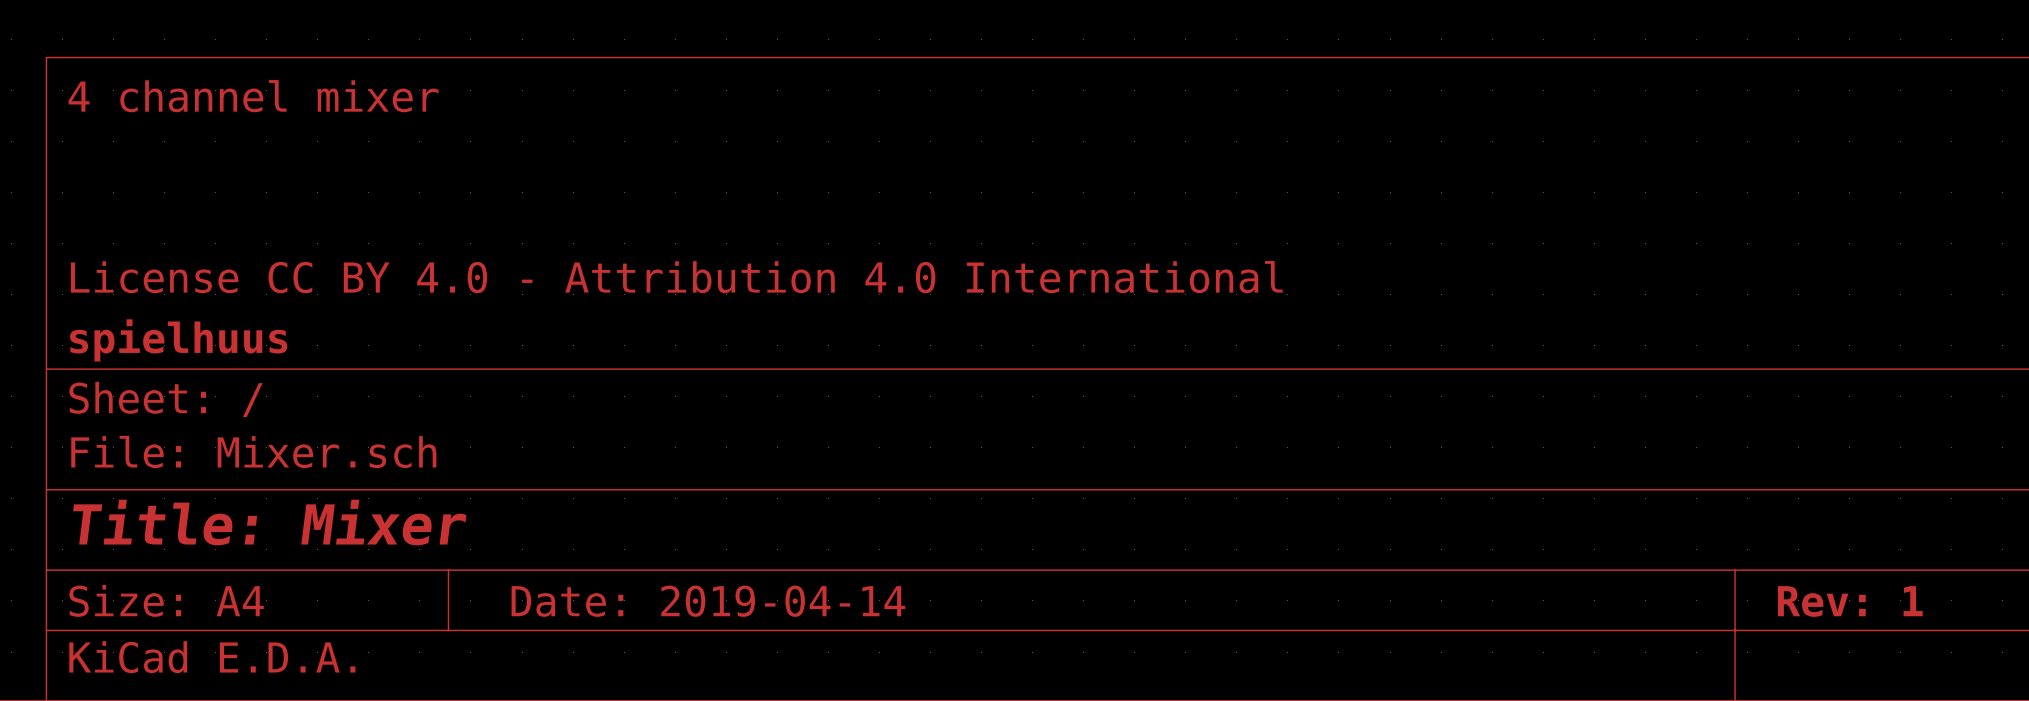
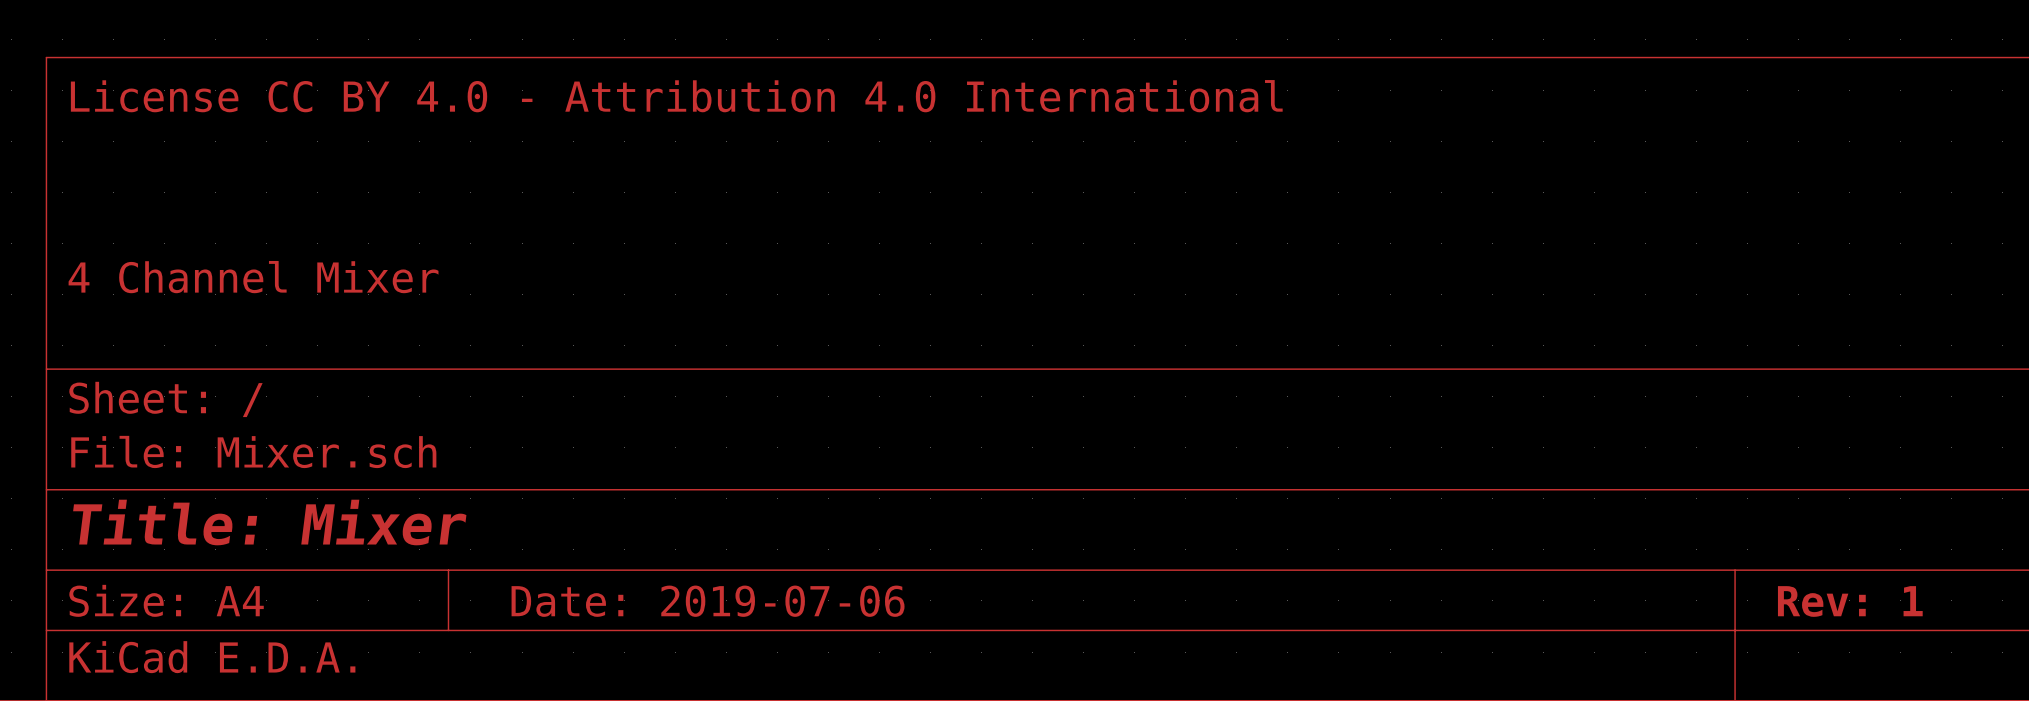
title block: 4 channel mixer (253, 96) -> License CC BY 4.0 - Attribution 4.0 International (676, 96)
title block: License CC BY 4.0 - Attribution 4.0 International (676, 277) -> 4 Channel Mixer (253, 277)
title block: spielhuus (178, 340) -> none
title block: Date: 2019-04-14 (708, 601) -> Date: 2019-07-06 (708, 601)

